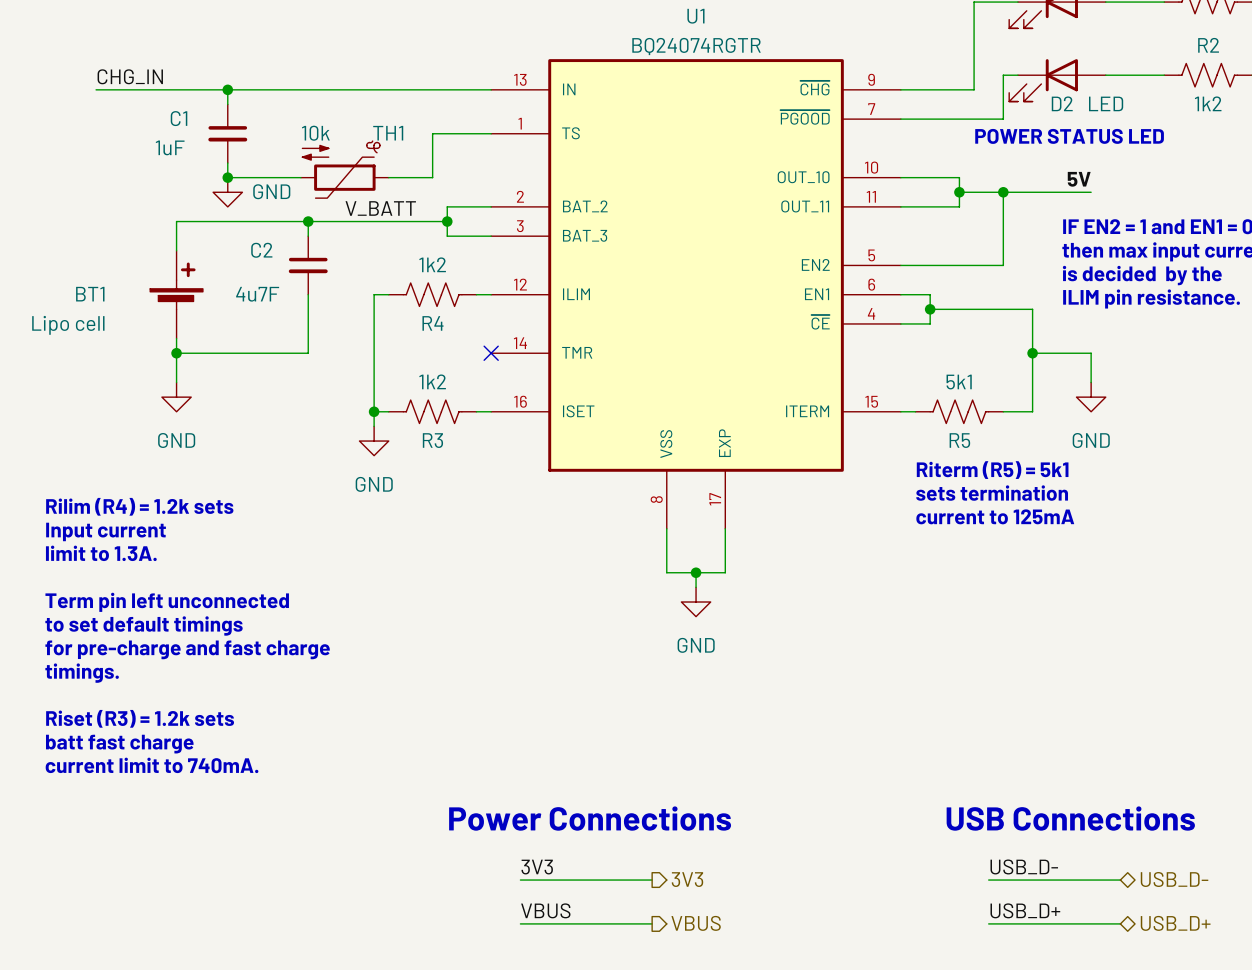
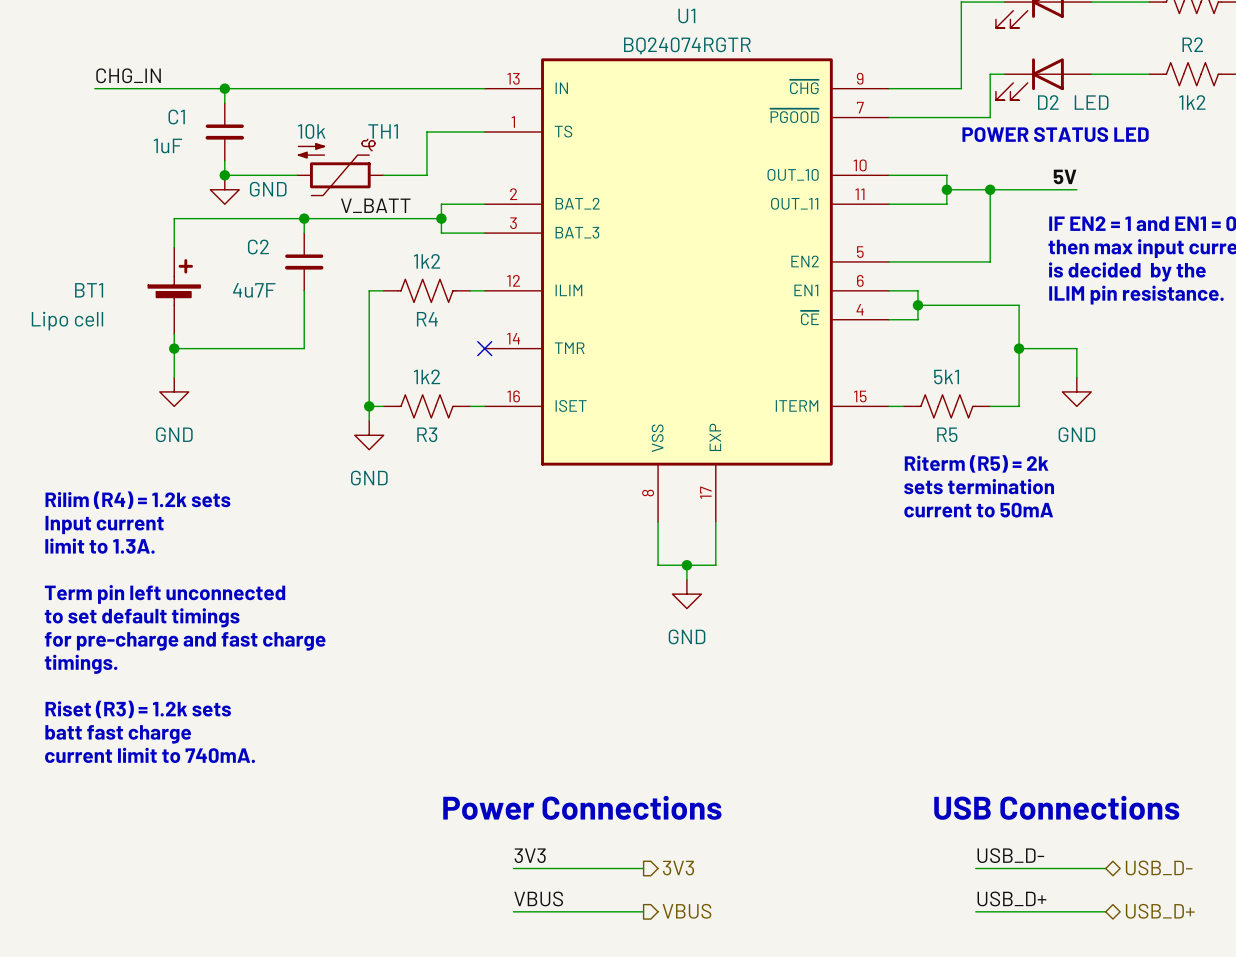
text: Riterm (R5) = 5k1 (992, 470) -> Riterm (R5) = 2k (976, 463)
text: current to 125mA (995, 516) -> current to 50mA (978, 510)

